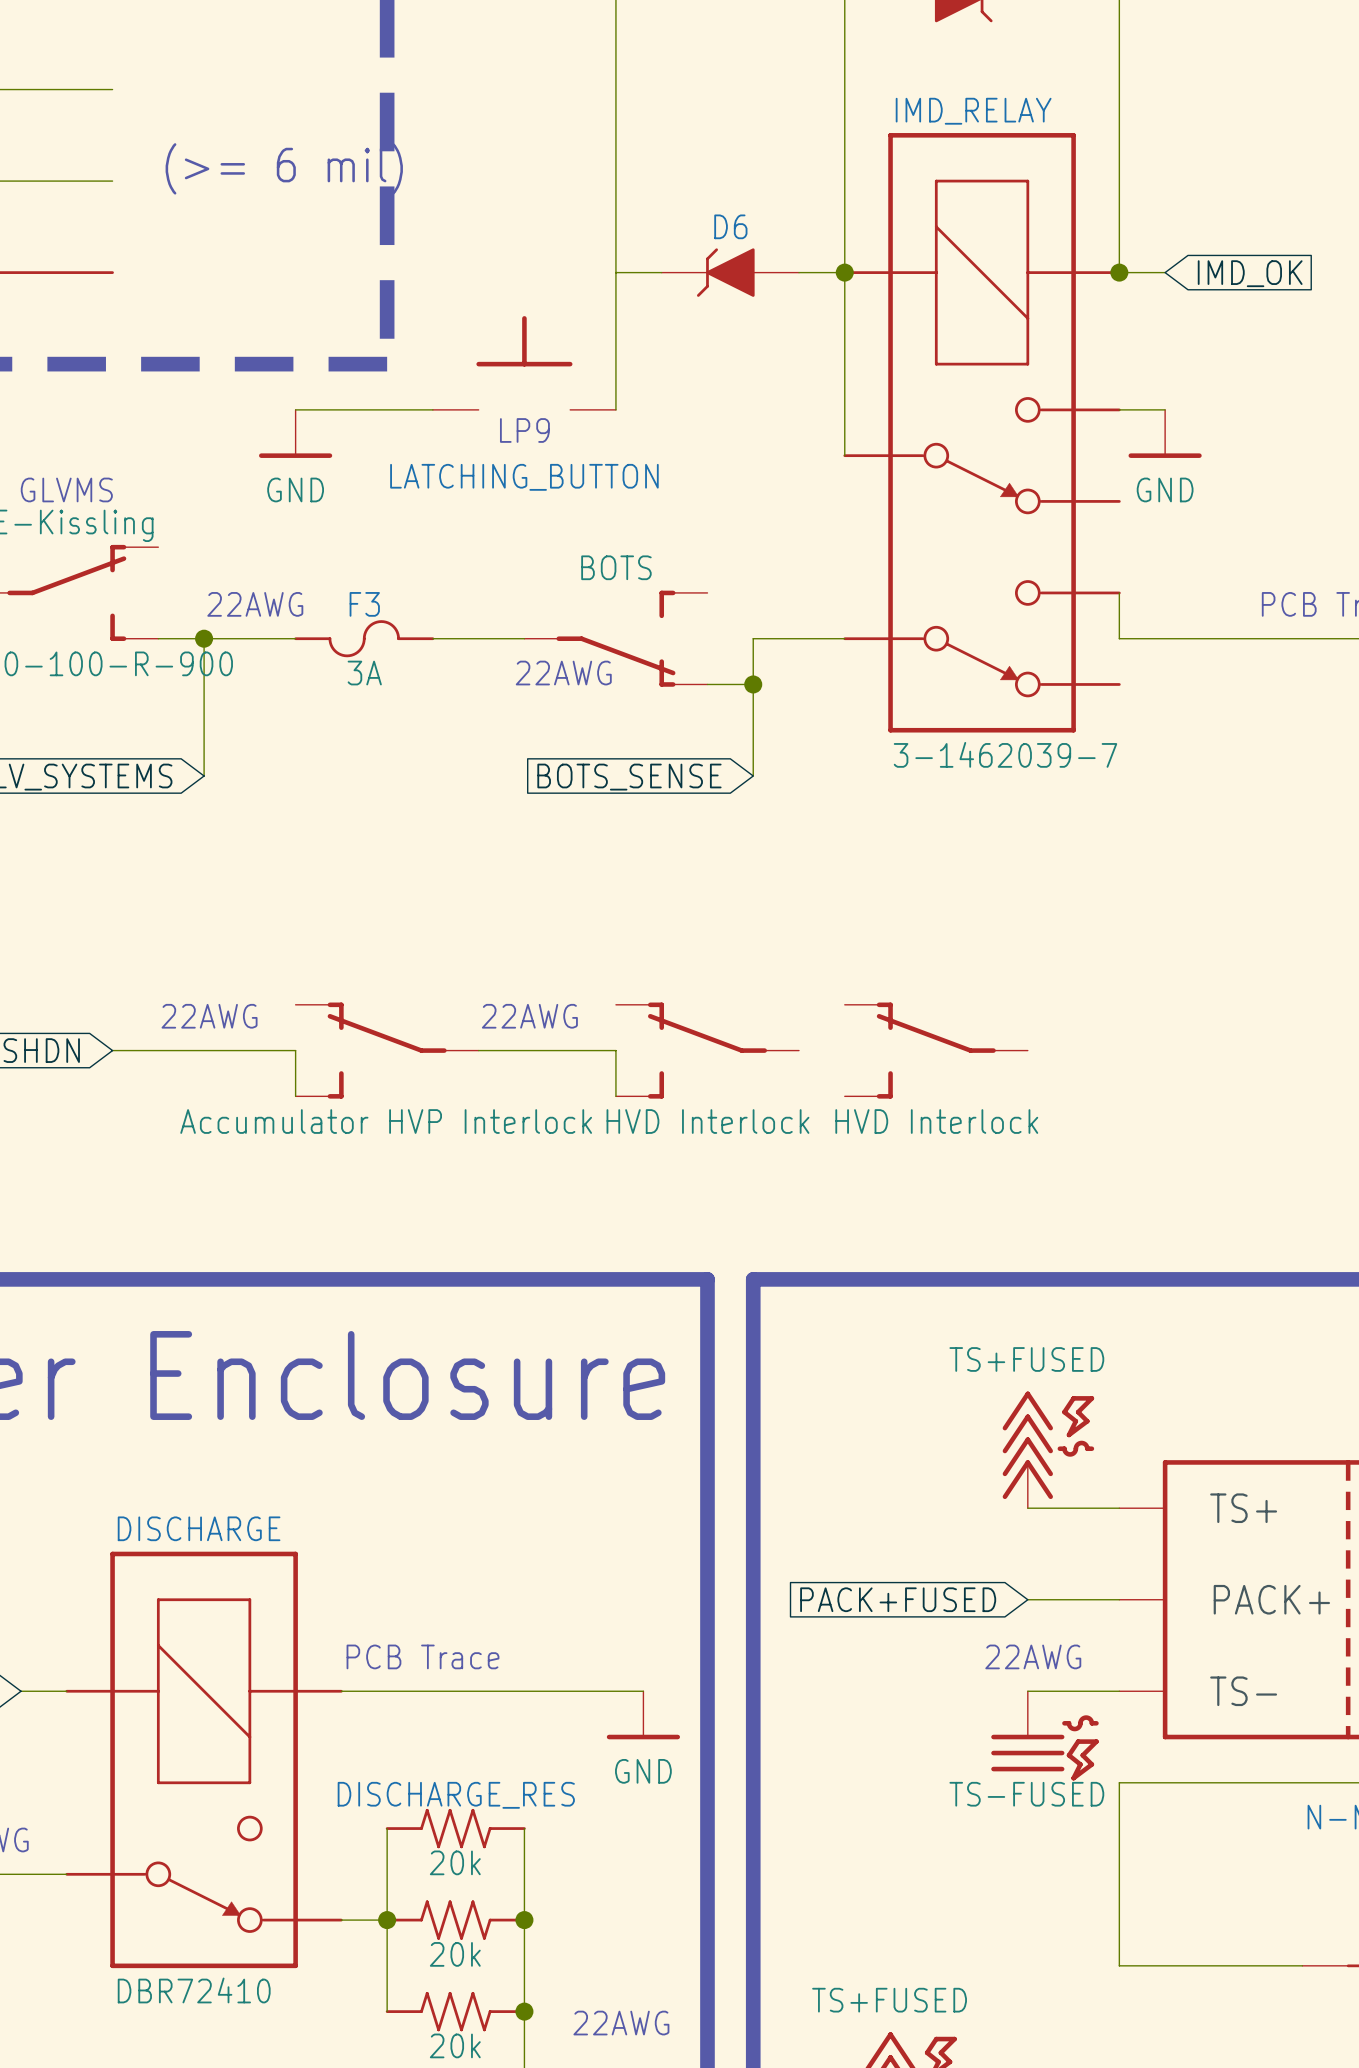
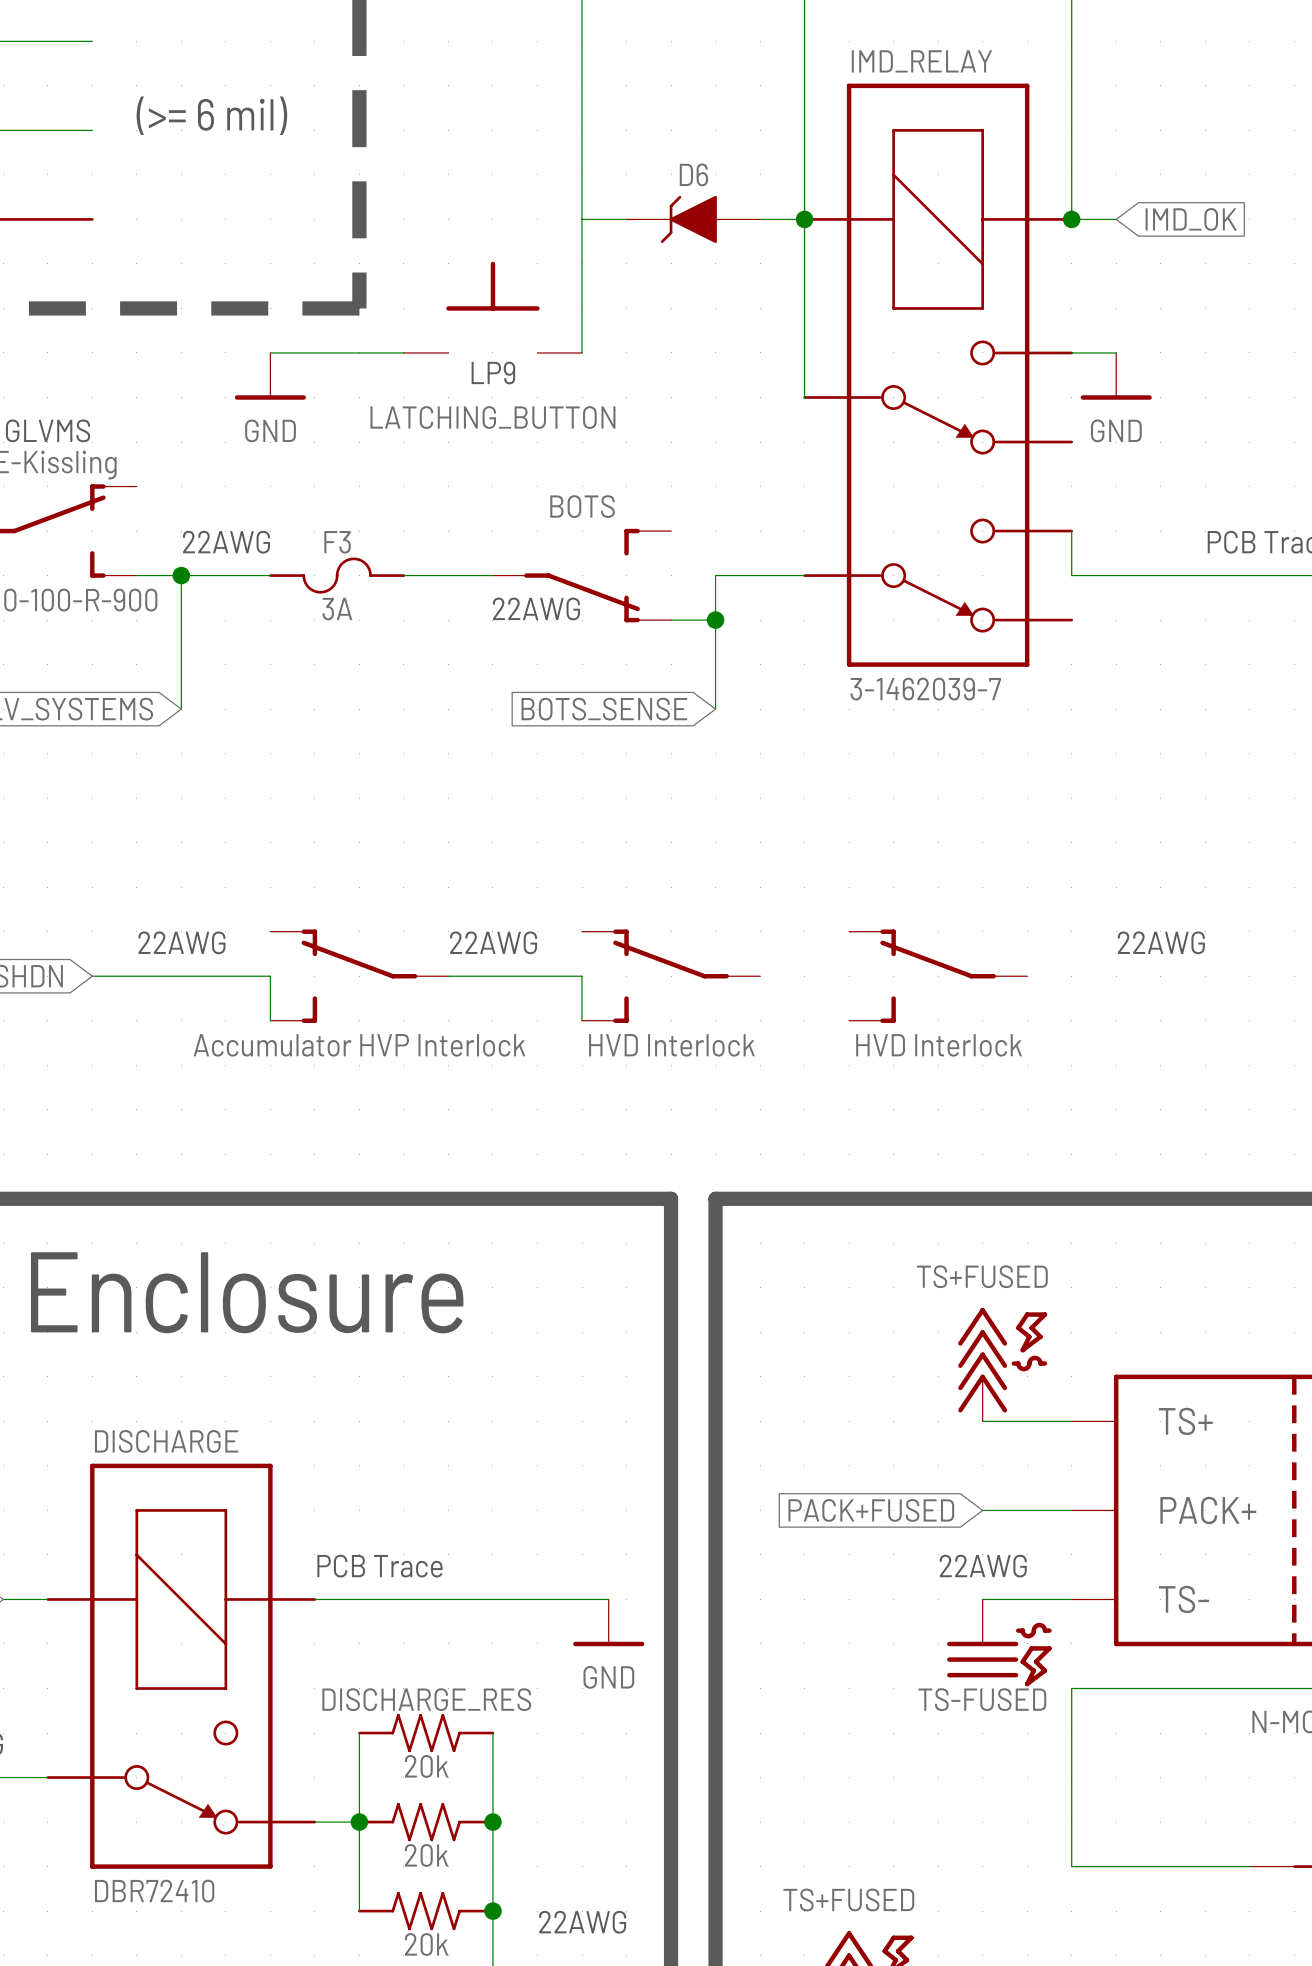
text: none -> 22AWG (1161, 942)
part position: (936, 1050) -> (938, 976)

